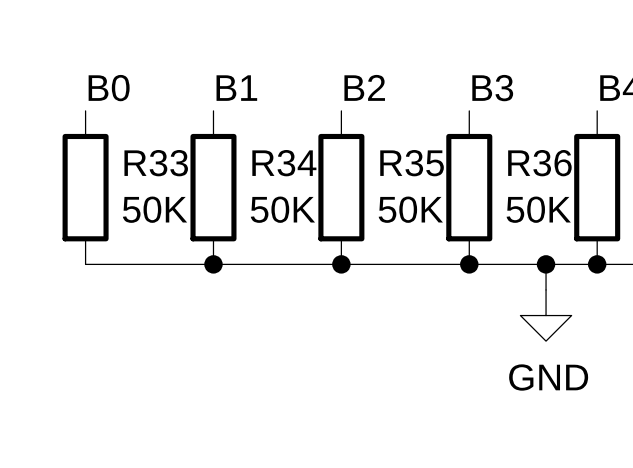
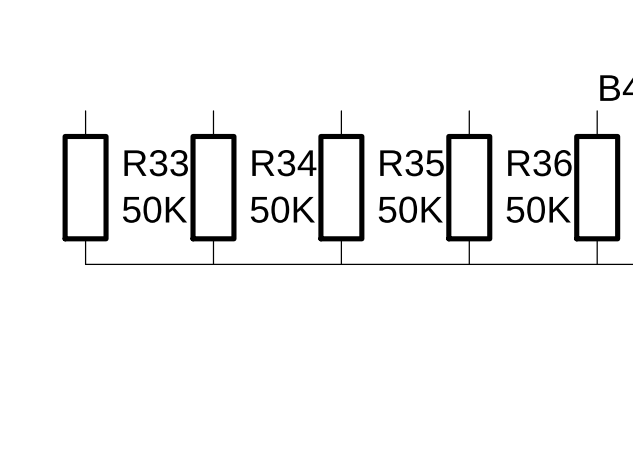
label: B2 (364, 87) -> none
label: B0 (109, 88) -> none
label: B1 (236, 88) -> none
label: B3 (492, 88) -> none
junction: (213, 264) -> none
junction: (341, 264) -> none
junction: (469, 264) -> none
wire: (546, 264) (546, 289) -> none
junction: (546, 264) -> none
junction: (597, 264) -> none
power symbol: GND (546, 315) -> none

